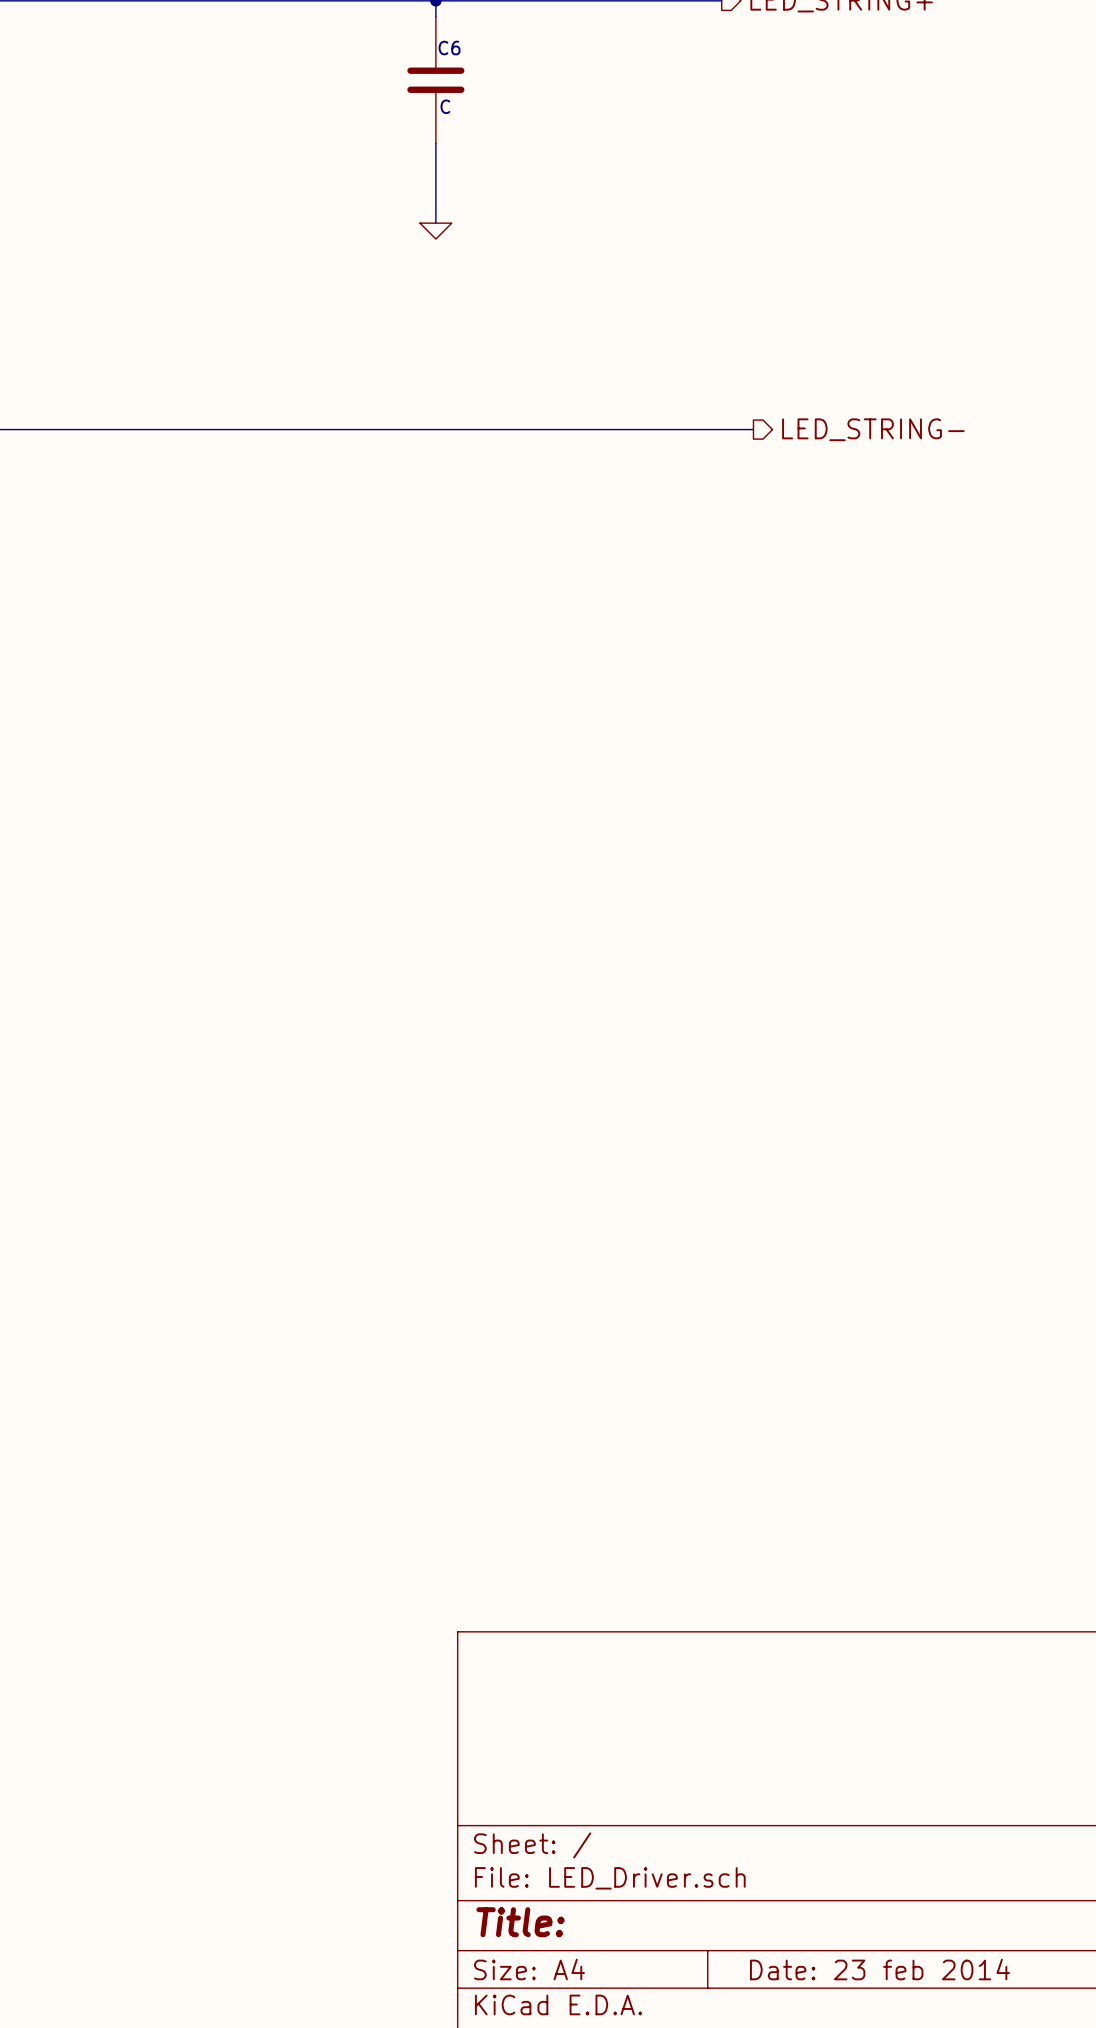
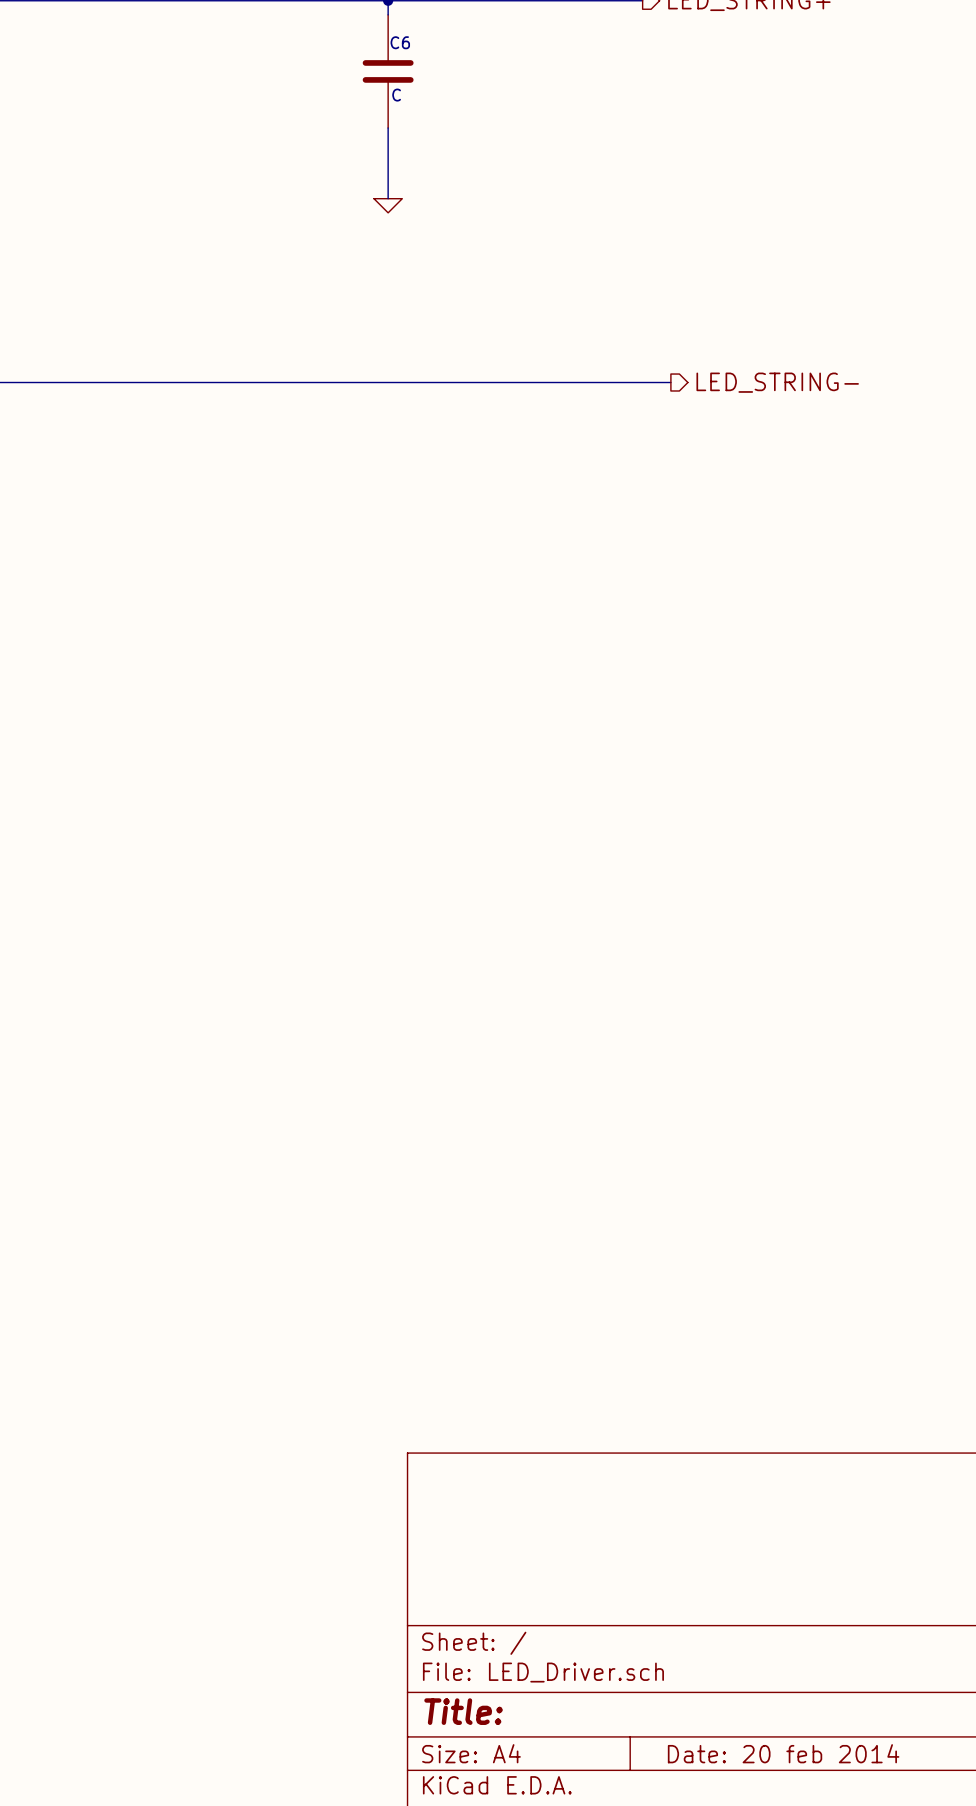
title block: Date: 23 feb 2014 (880, 1969) -> Date: 20 feb 2014 (783, 1753)

